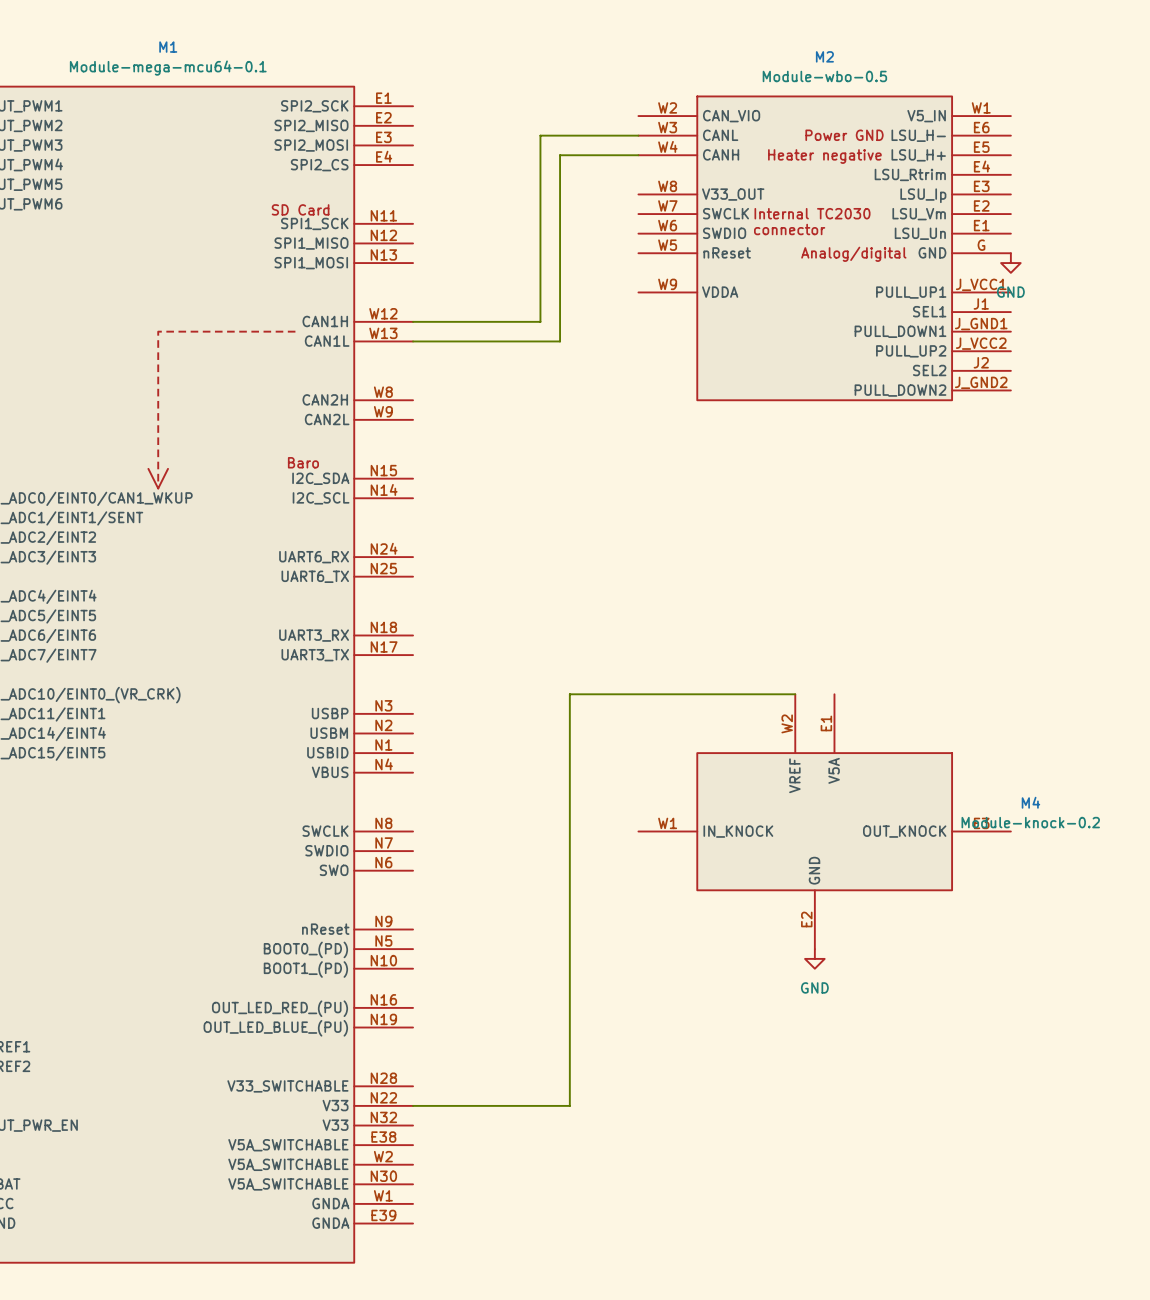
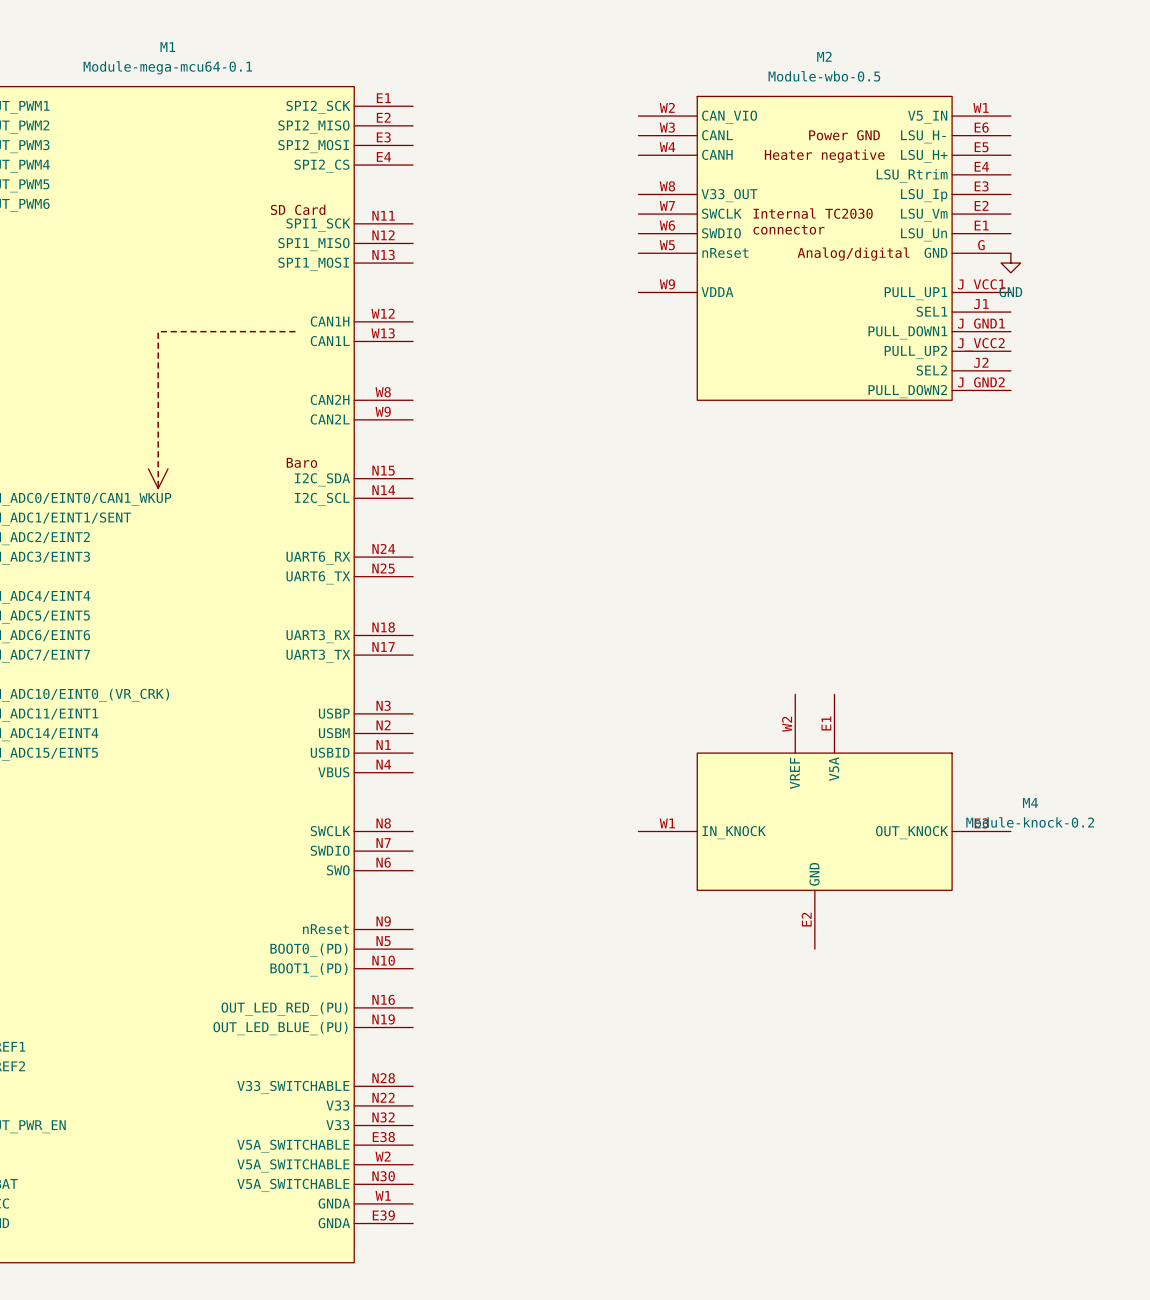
wire: (638, 135) (540, 135) (540, 321) (413, 321) -> none
wire: (638, 155) (560, 155) (560, 341) (413, 341) -> none
wire: (795, 694) (569, 694) (569, 1105) (413, 1105) -> none
power symbol: GND (814, 958) -> none

